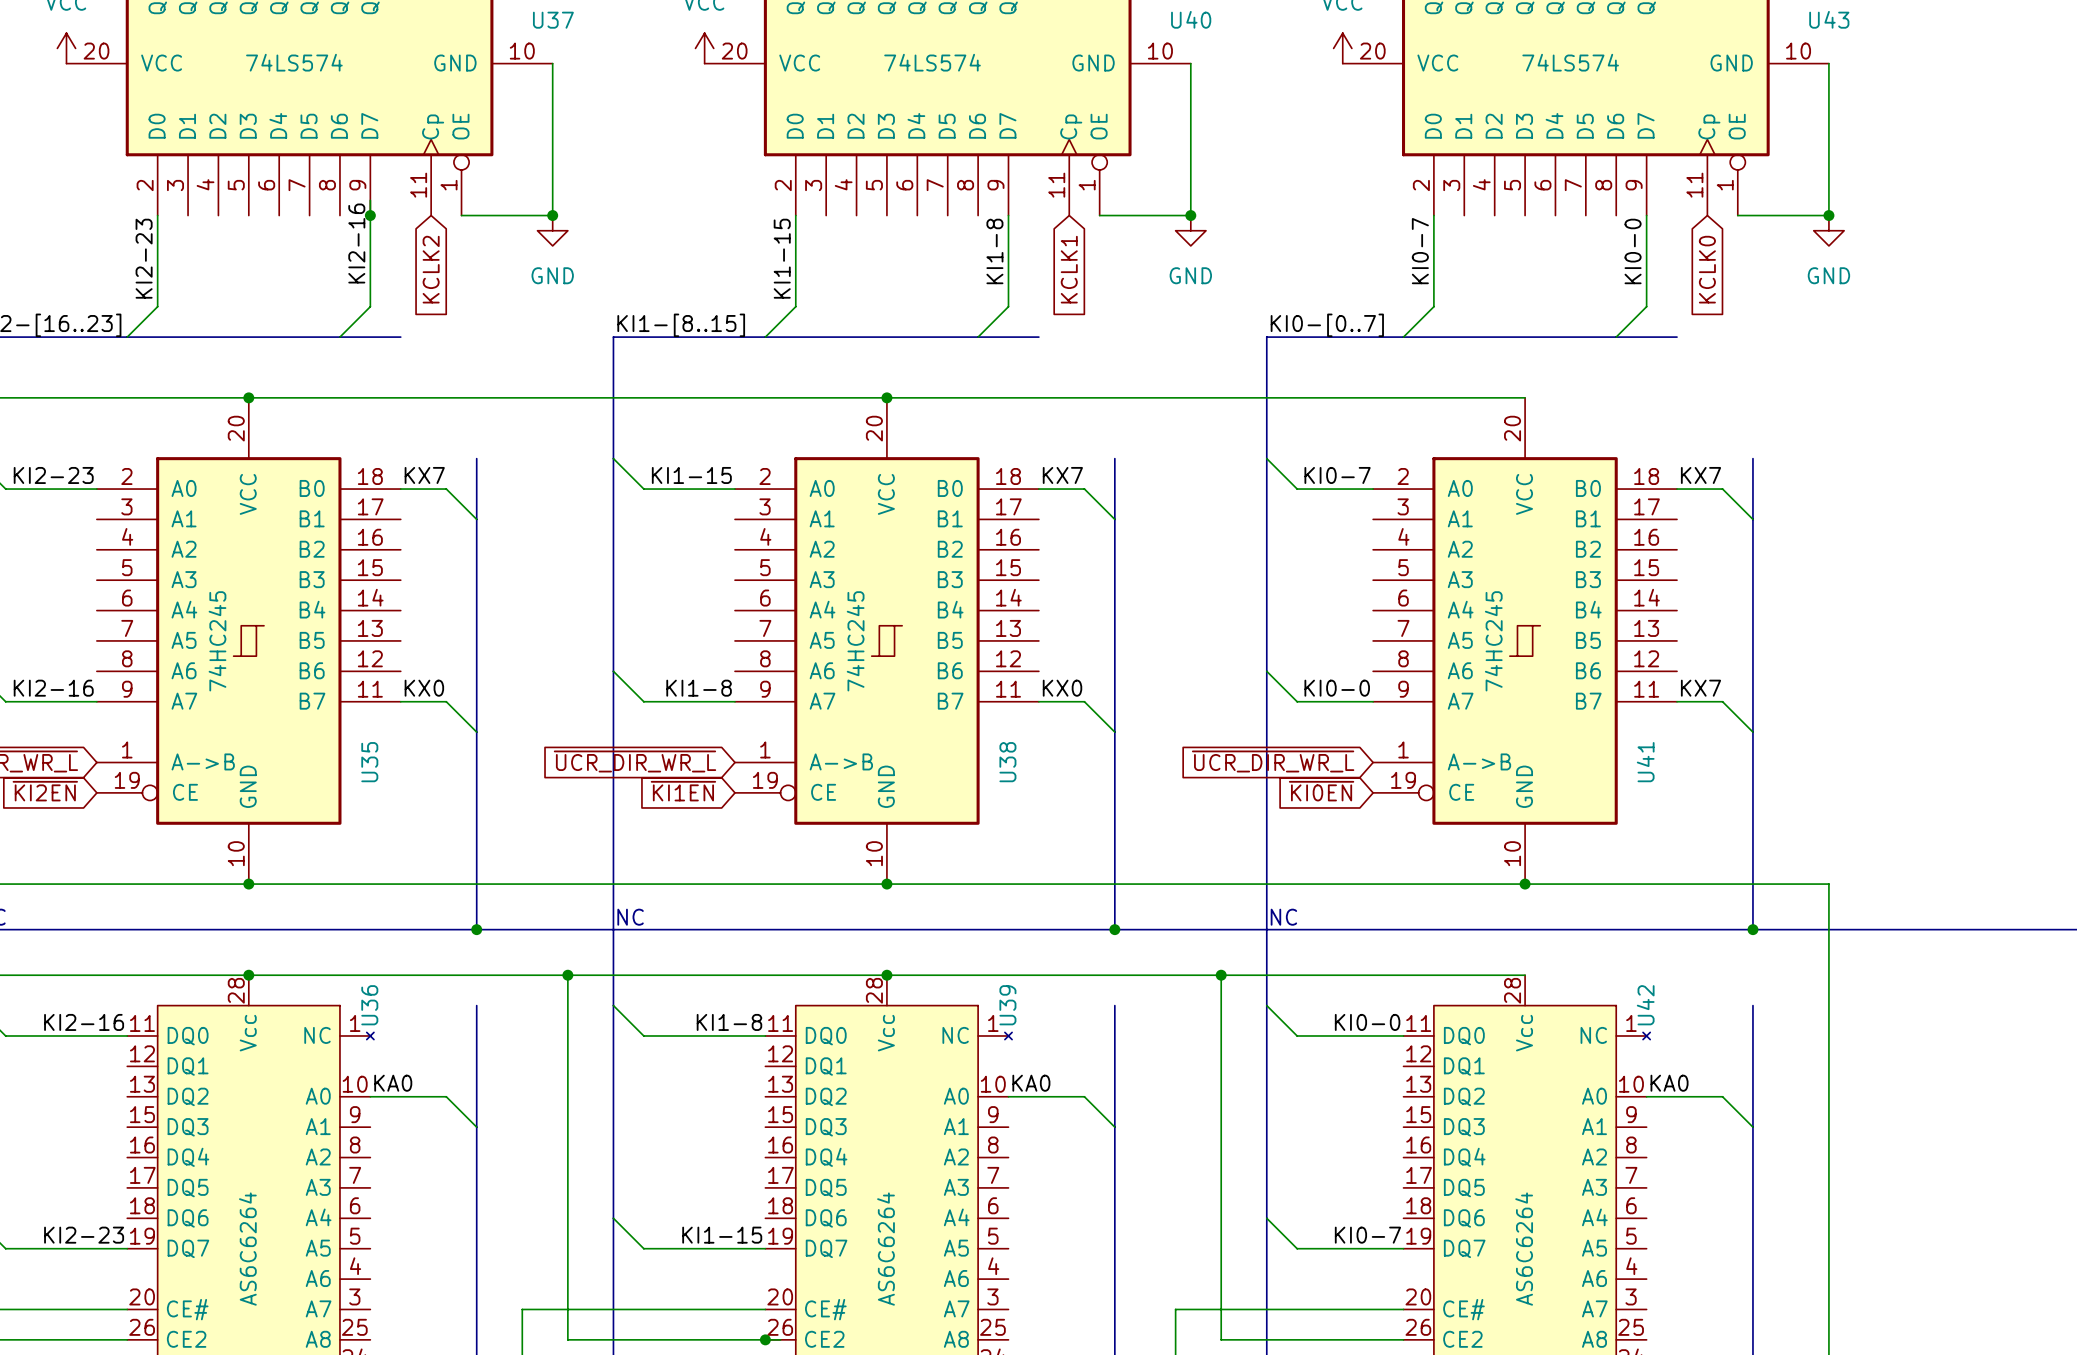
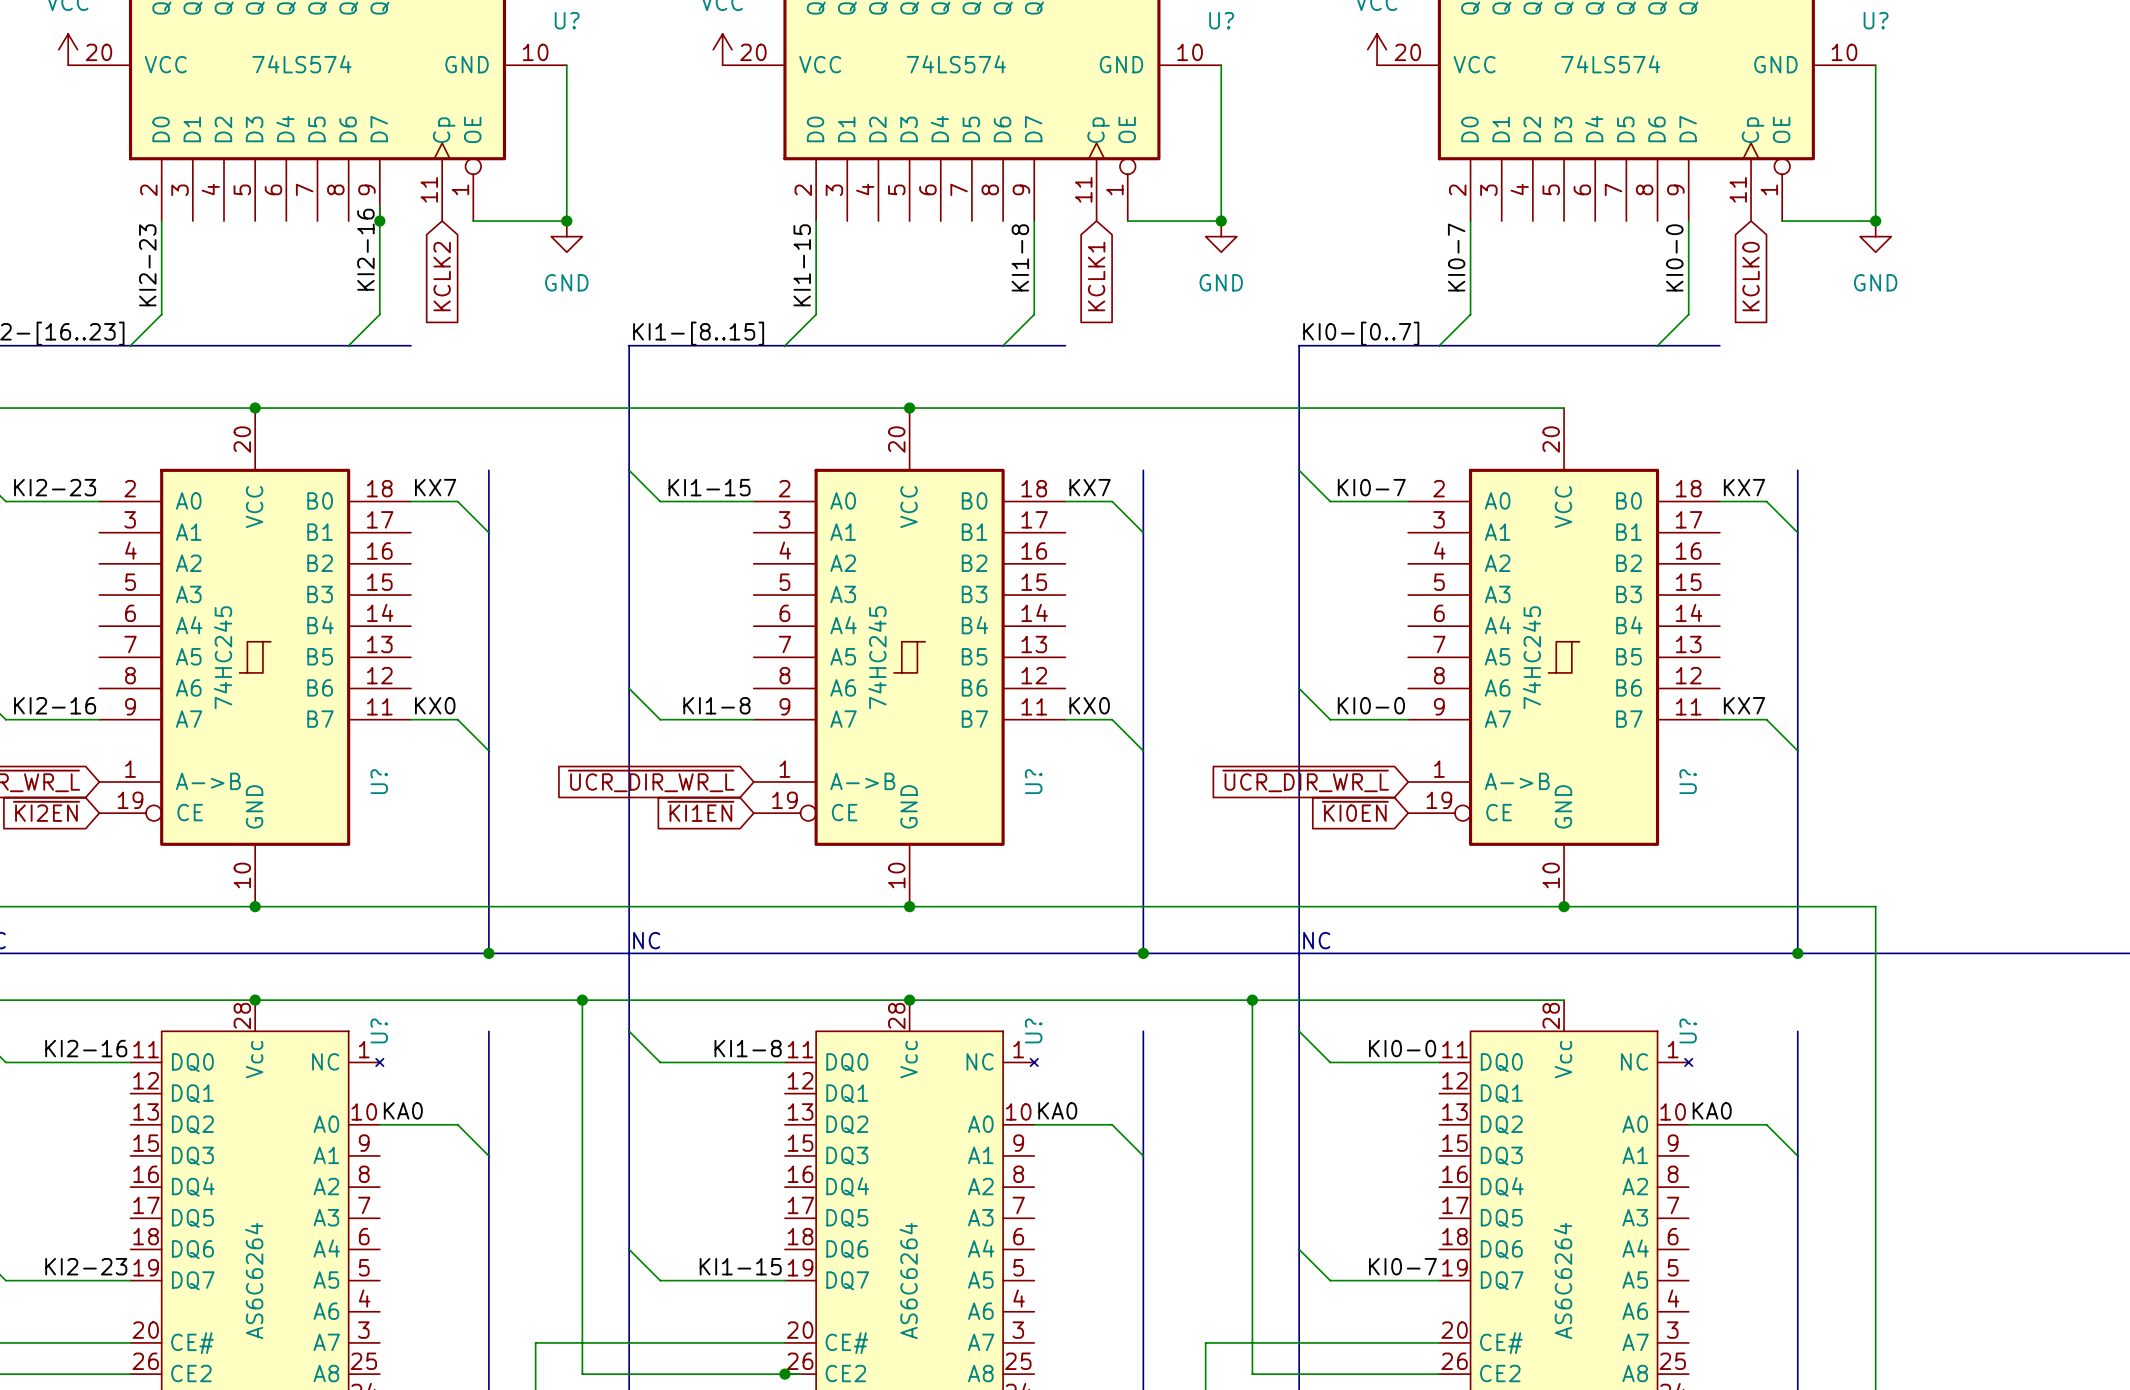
U40 name: U40 (1191, 19) -> U? (1221, 20)
U43 name: U43 (1829, 19) -> U? (1876, 20)
U37 name: U37 (553, 20) -> U? (567, 20)
U35 name: U35 (369, 762) -> U? (379, 781)
U38 name: U38 (1007, 762) -> U? (1033, 781)
U41 name: U41 (1645, 762) -> U? (1688, 781)
U36 name: U36 (369, 1005) -> U? (379, 1030)
U39 name: U39 (1007, 1005) -> U? (1033, 1030)
U42 name: U42 (1645, 1005) -> U? (1688, 1030)

